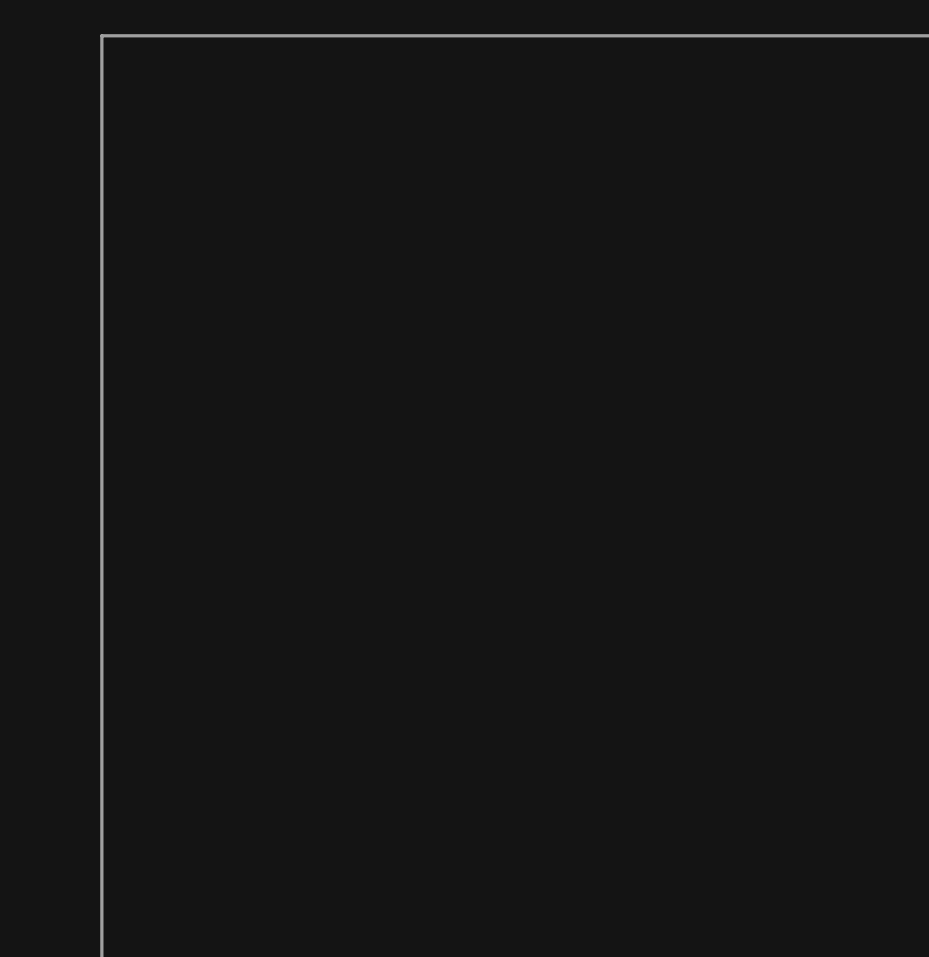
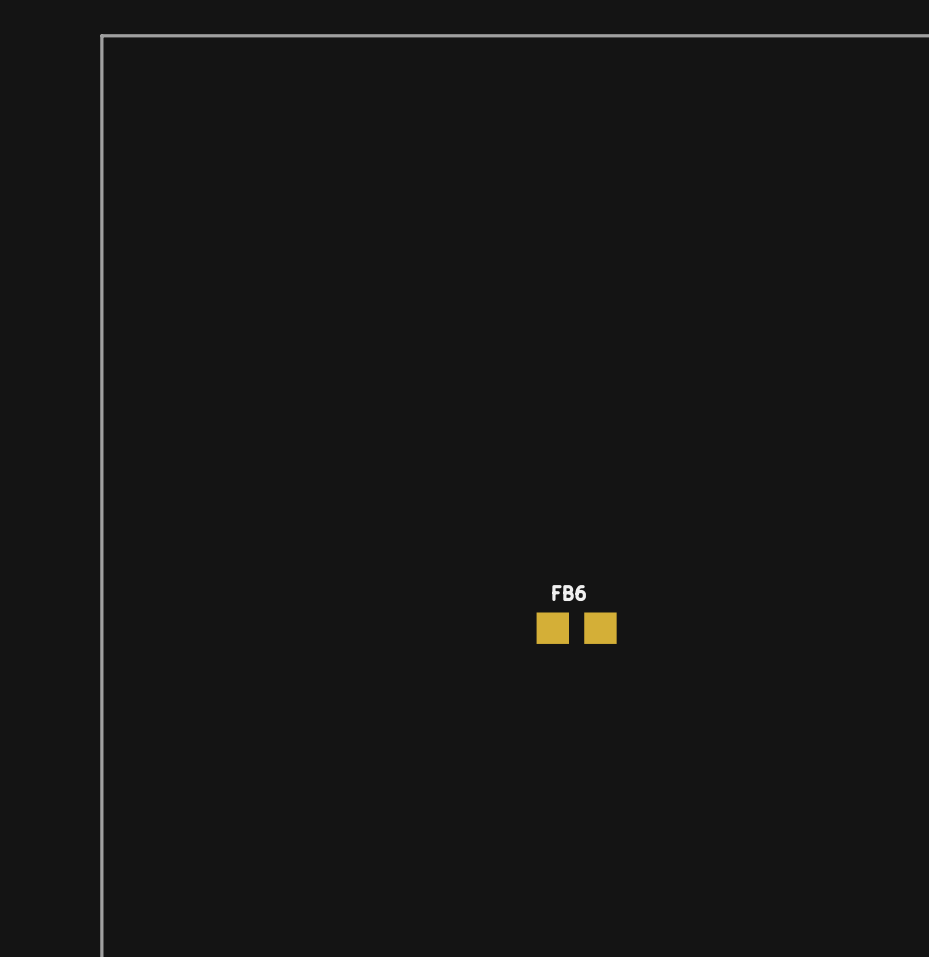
FB6: none -> (576, 628)

